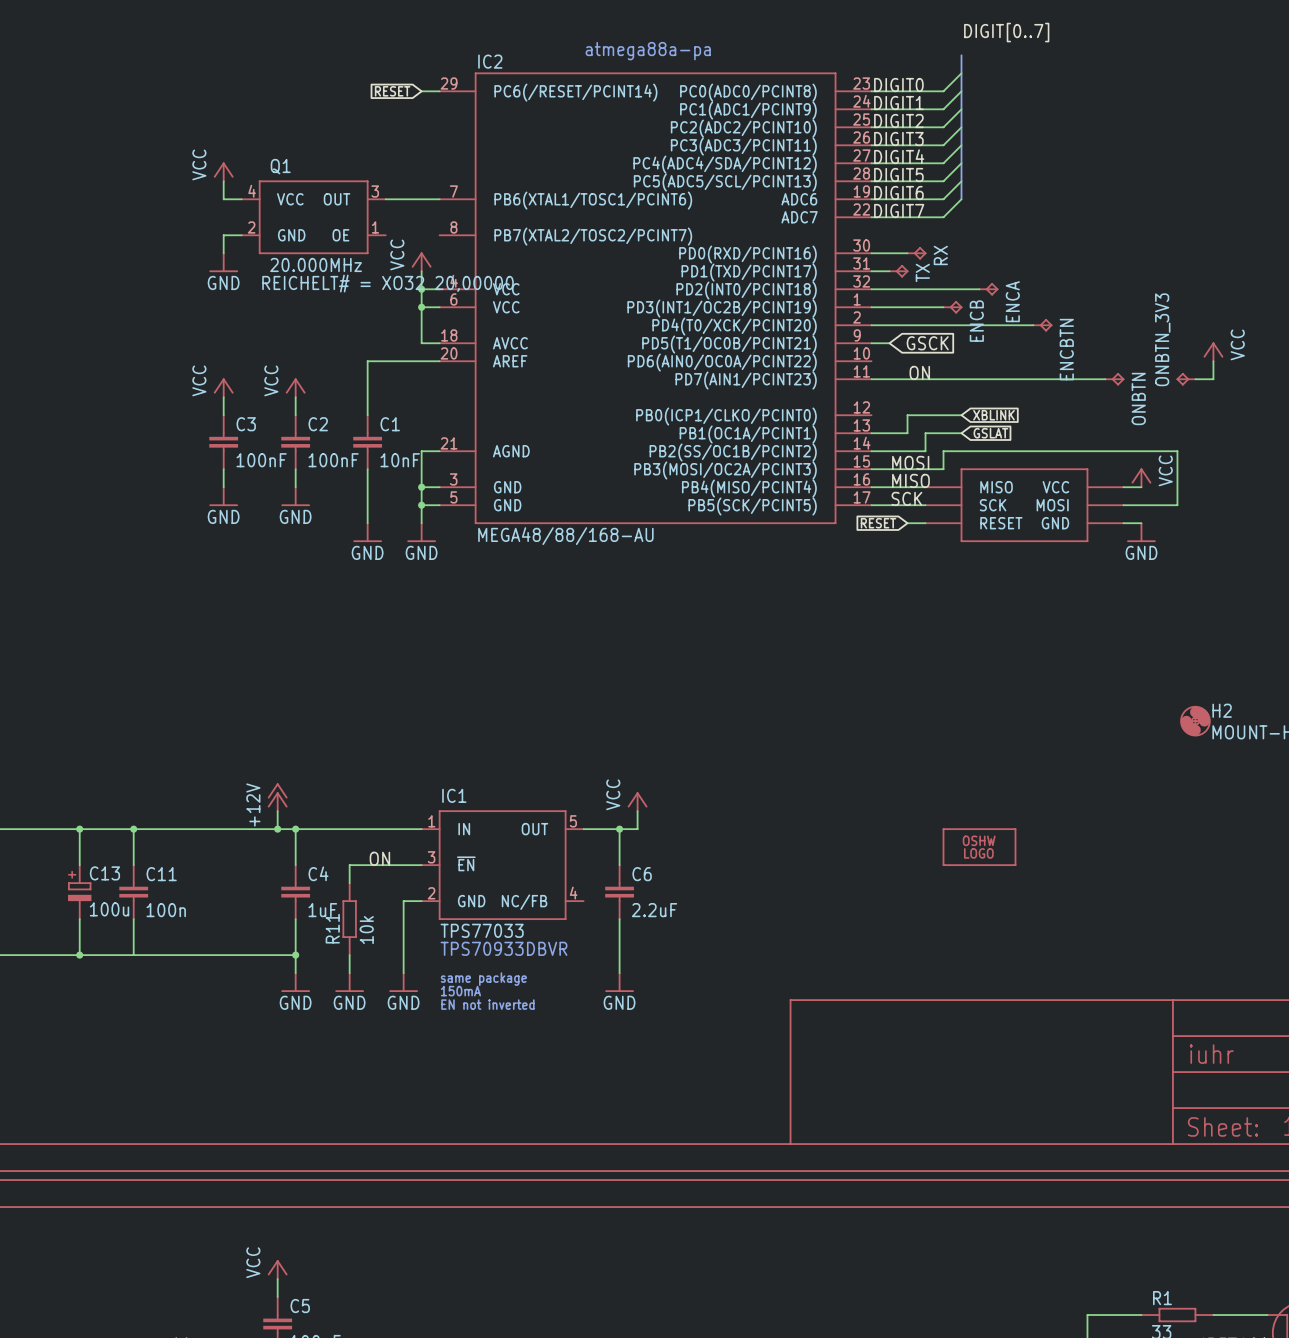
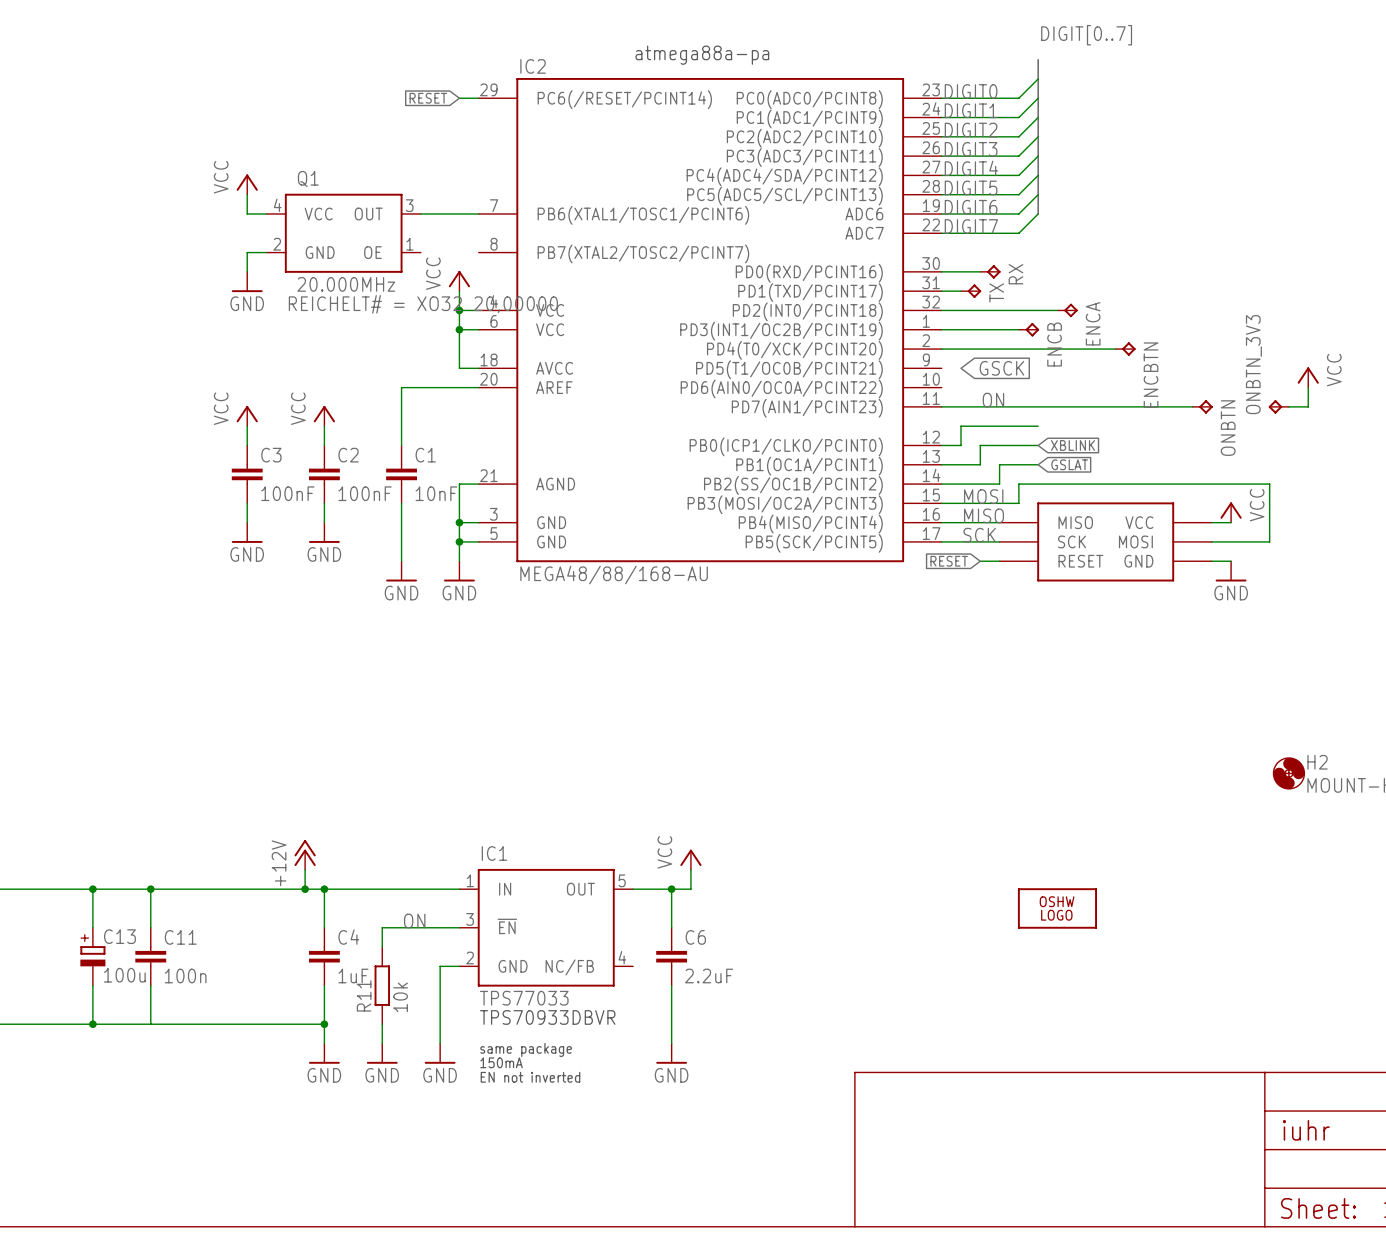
wire: (871, 343) (889, 343) -> none
wire: none -> (1038, 426) (961, 426) (961, 445) (941, 445)

